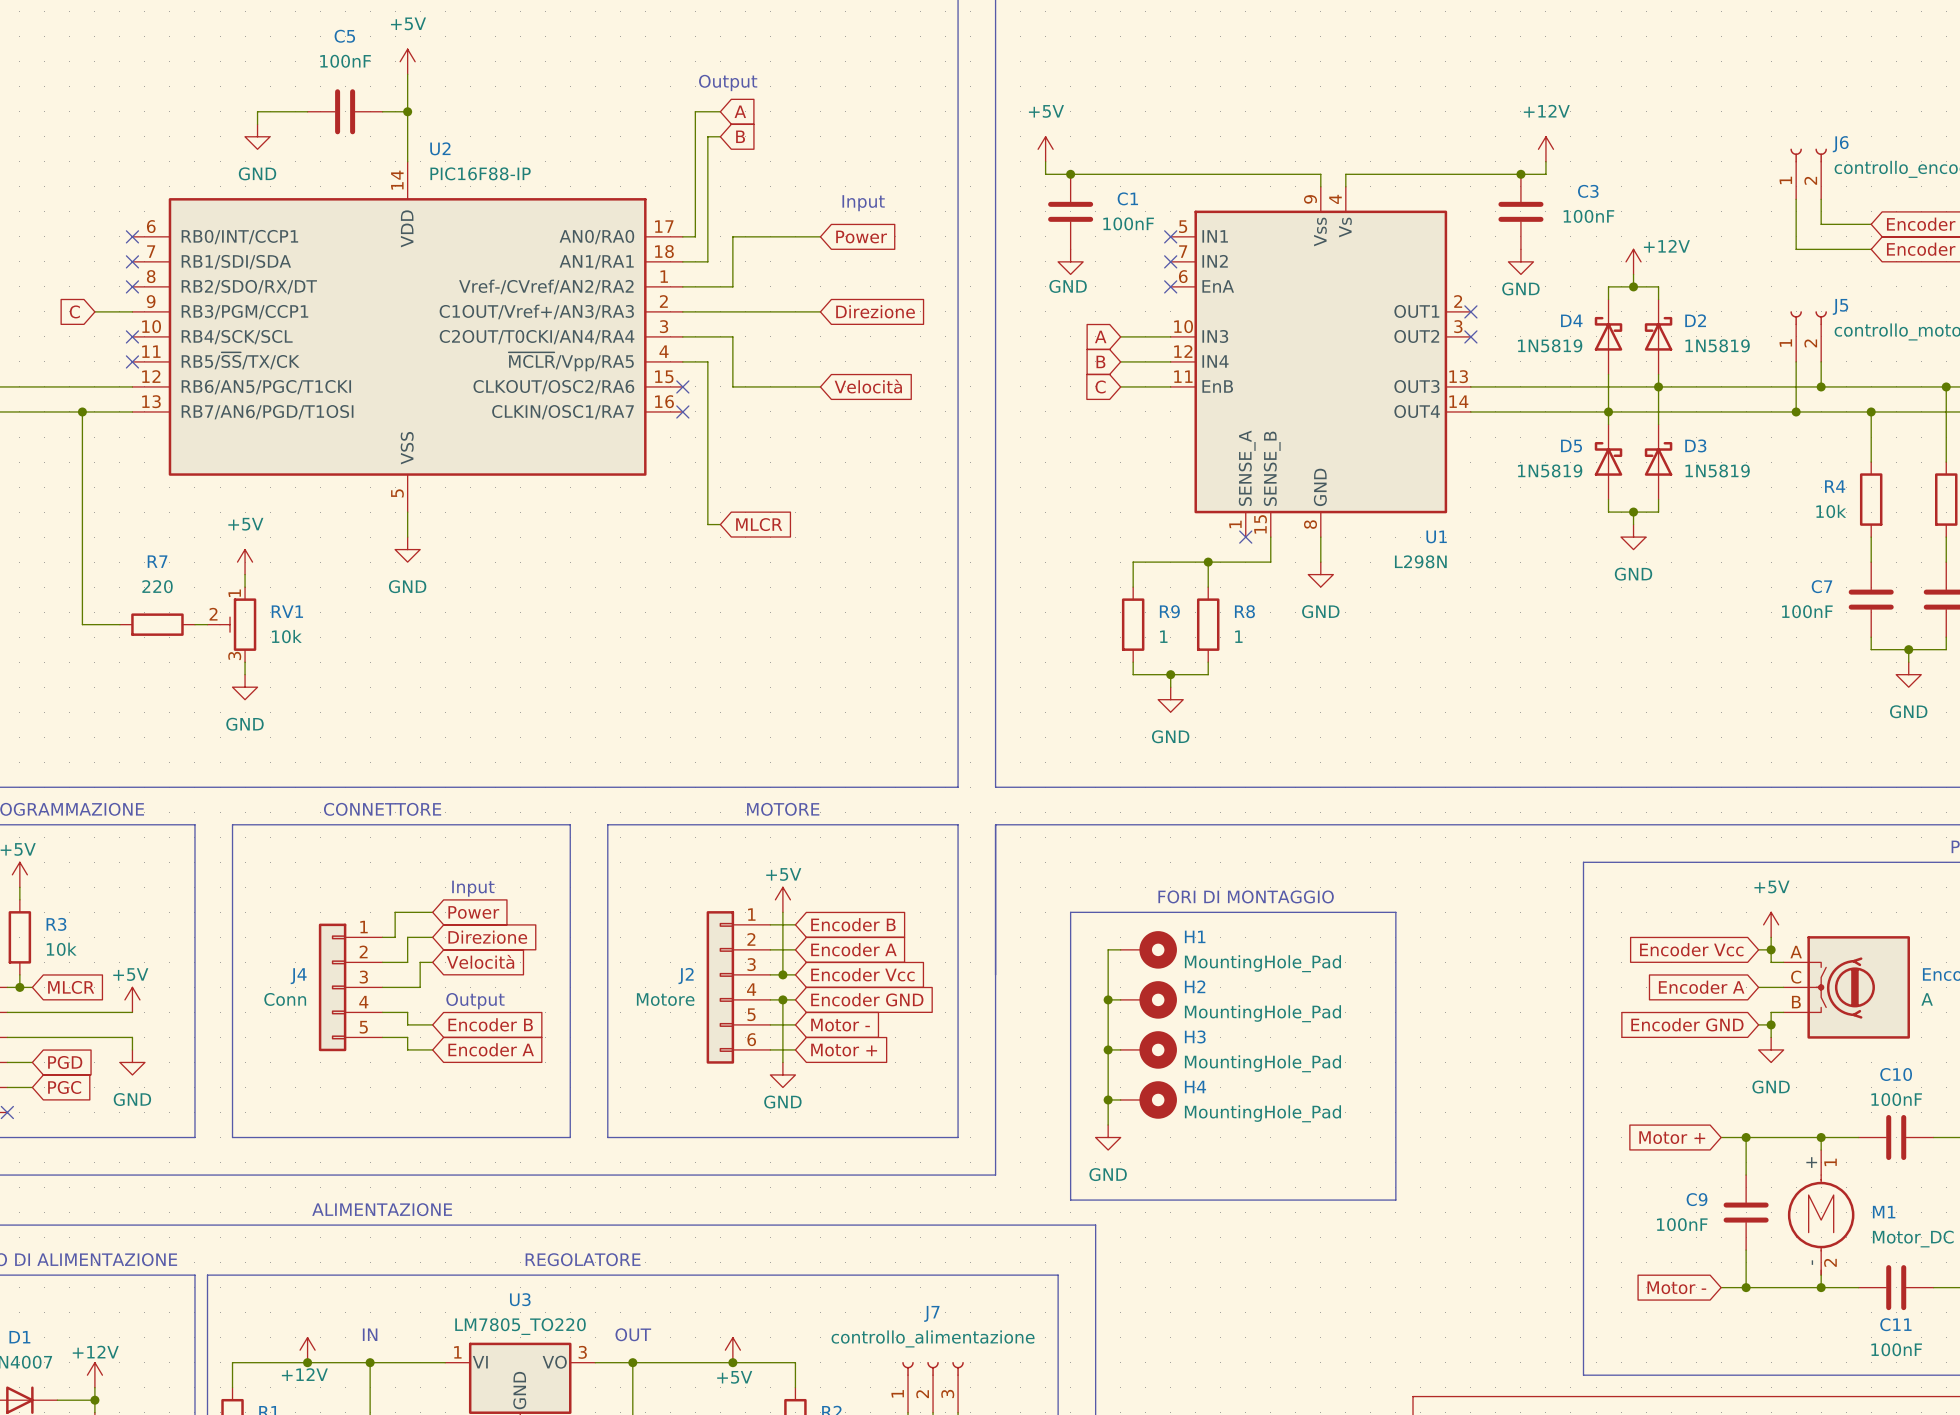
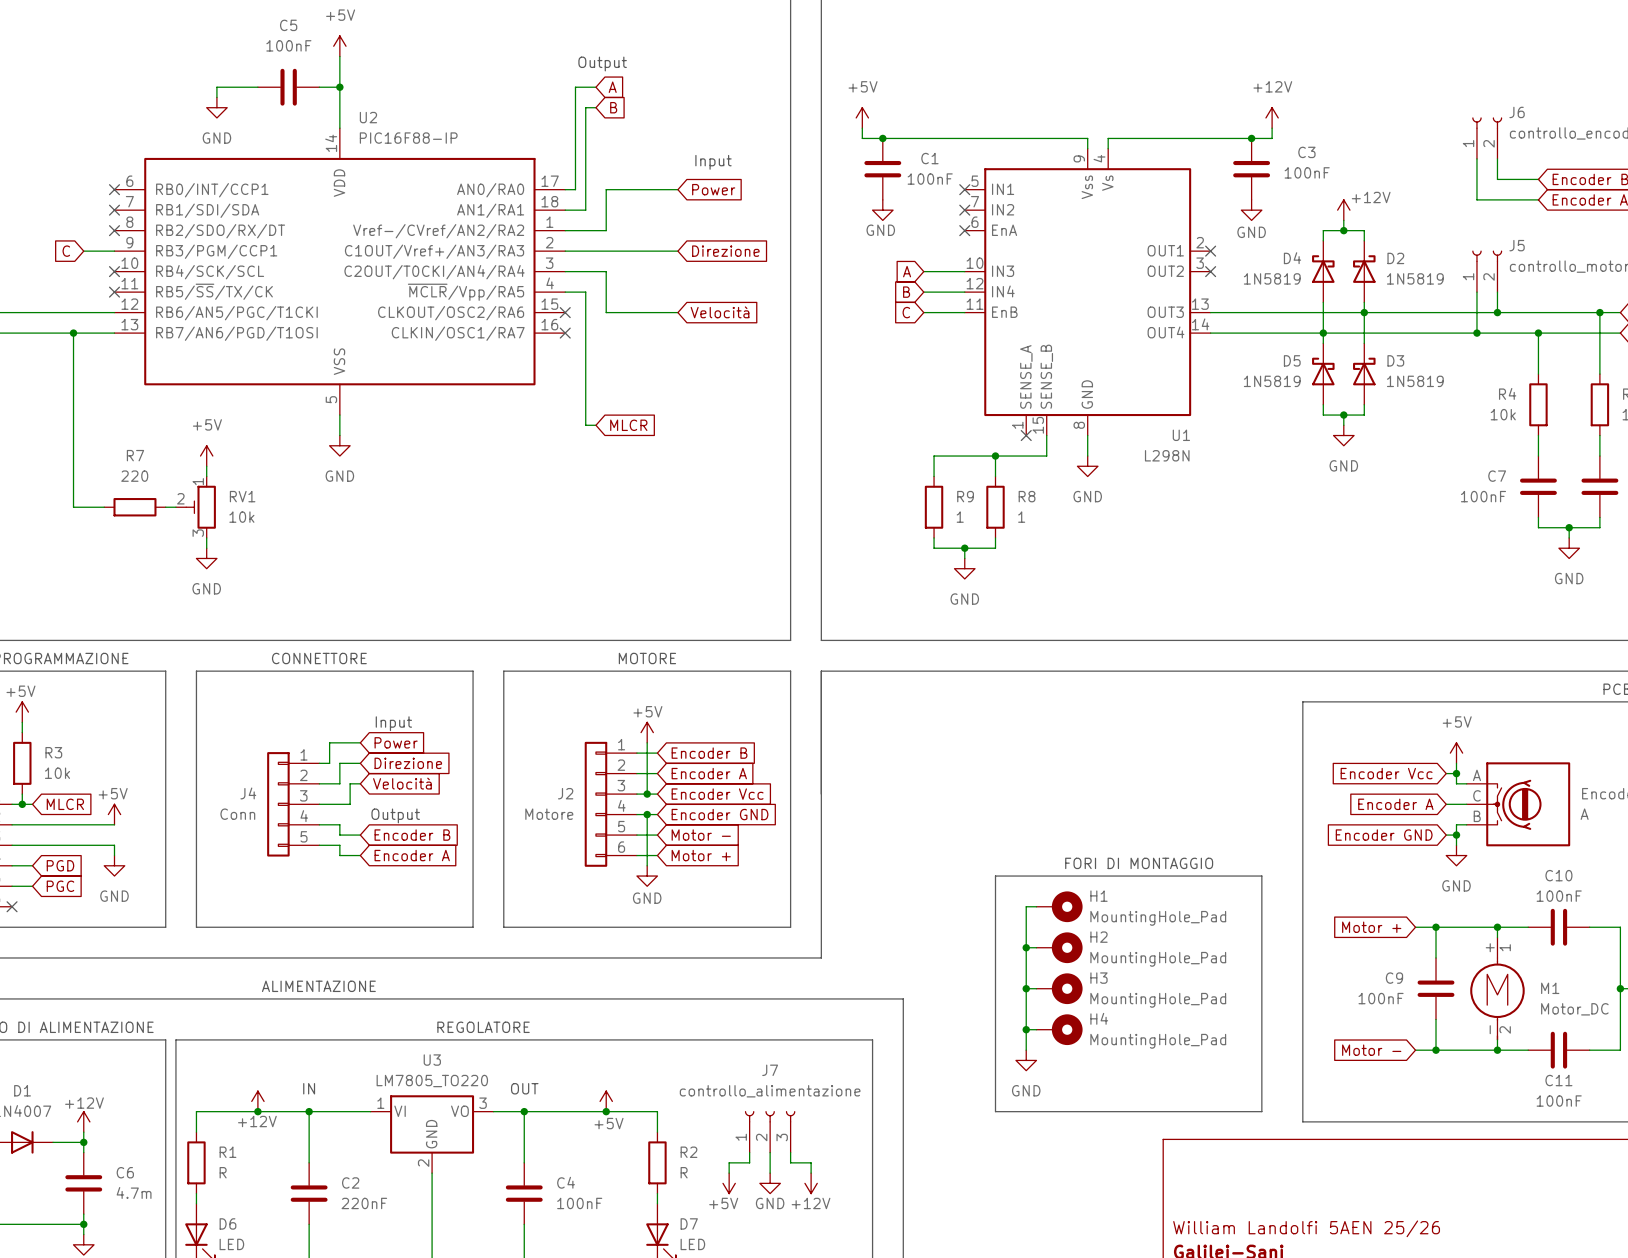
text position: FORI DI MONTAGGIO (1246, 896) -> FORI DI MONTAGGIO (1139, 863)
line: (1070, 912) (1395, 912) (1395, 1200) (1070, 1200) (1070, 912) -> (995, 876) (1261, 876) (1261, 1111) (995, 1111) (995, 876)
wire: (1120, 949) (1108, 949) (1108, 1125) -> (1036, 906) (1026, 906) (1026, 1050)
H1 position: (1148, 949) -> (1059, 906)
wire: (1108, 999) (1120, 999) -> (1026, 947) (1036, 947)
junction: (1108, 999) -> none
H2 position: (1148, 999) -> (1059, 947)
wire: (1108, 1049) (1120, 1049) -> (1026, 988) (1036, 988)
junction: (1108, 1049) -> none
H3 position: (1148, 1049) -> (1059, 988)
wire: (1108, 1099) (1120, 1099) -> (1026, 1029) (1036, 1029)
junction: (1108, 1099) -> none
H4 position: (1148, 1099) -> (1059, 1029)
power symbol position: GND (1108, 1137) -> GND (1026, 1060)
junction: none -> (1026, 947)
junction: none -> (1026, 988)
junction: none -> (1026, 1029)

